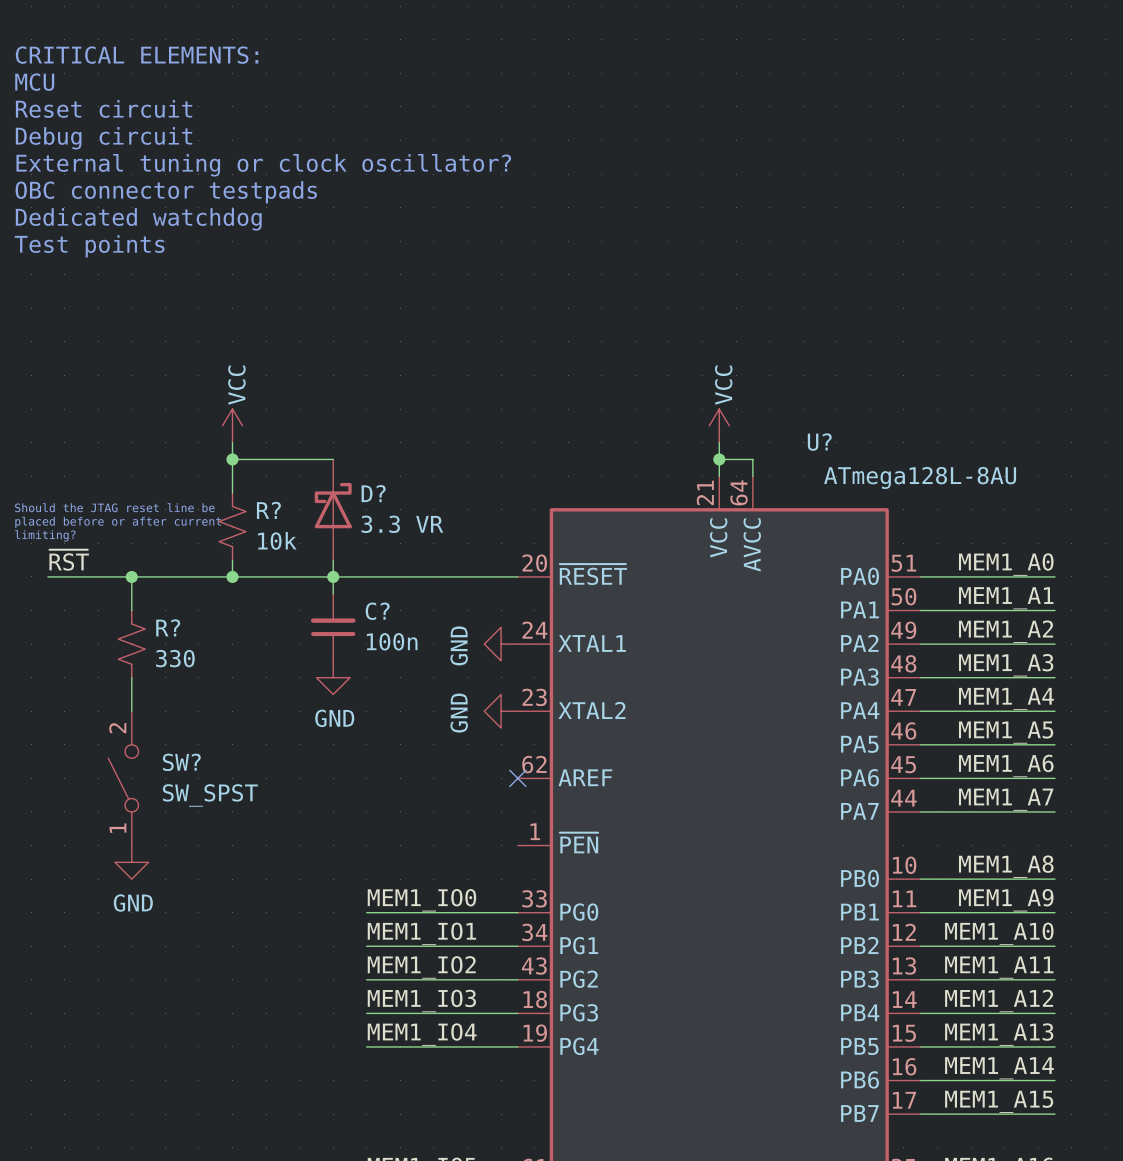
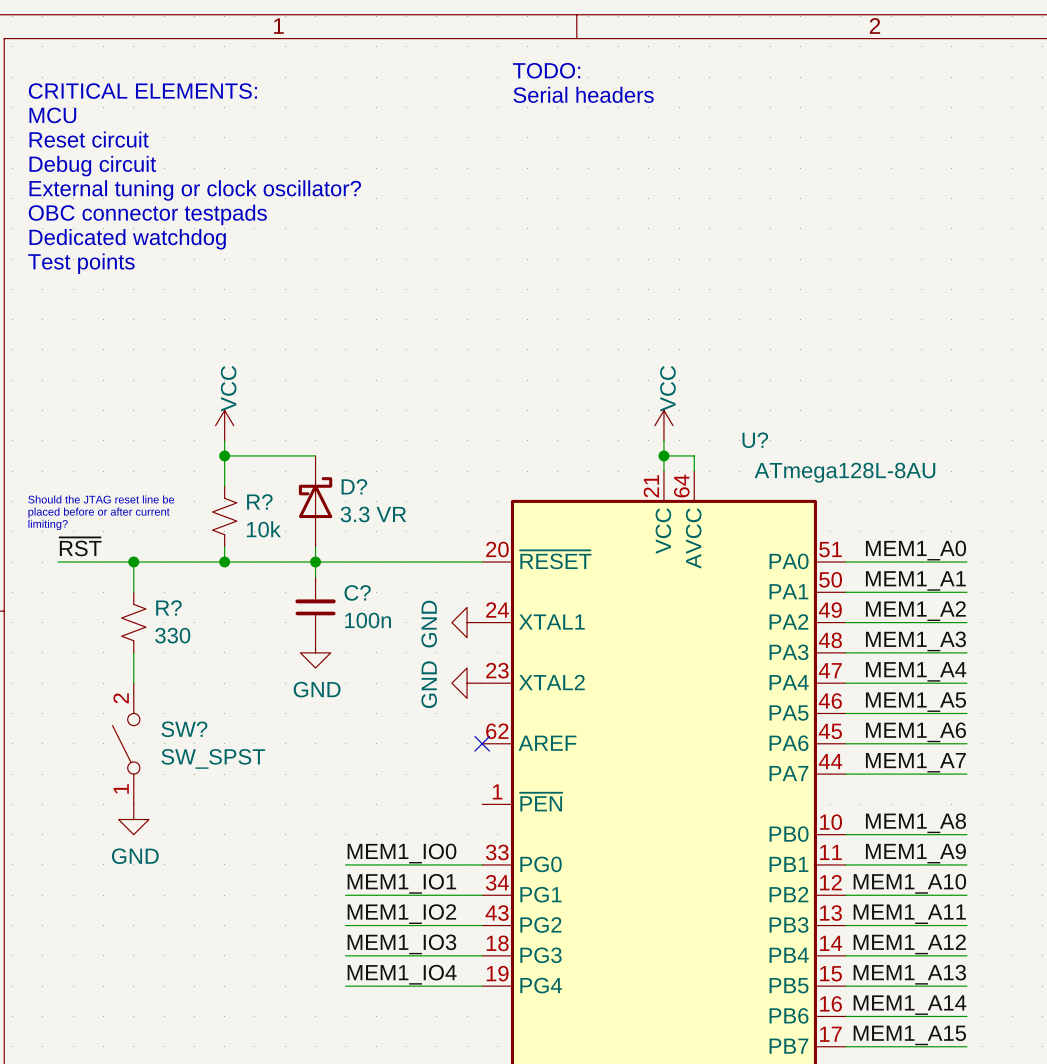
text: none -> TODO: (546, 70)
text: none -> Serial headers (583, 94)

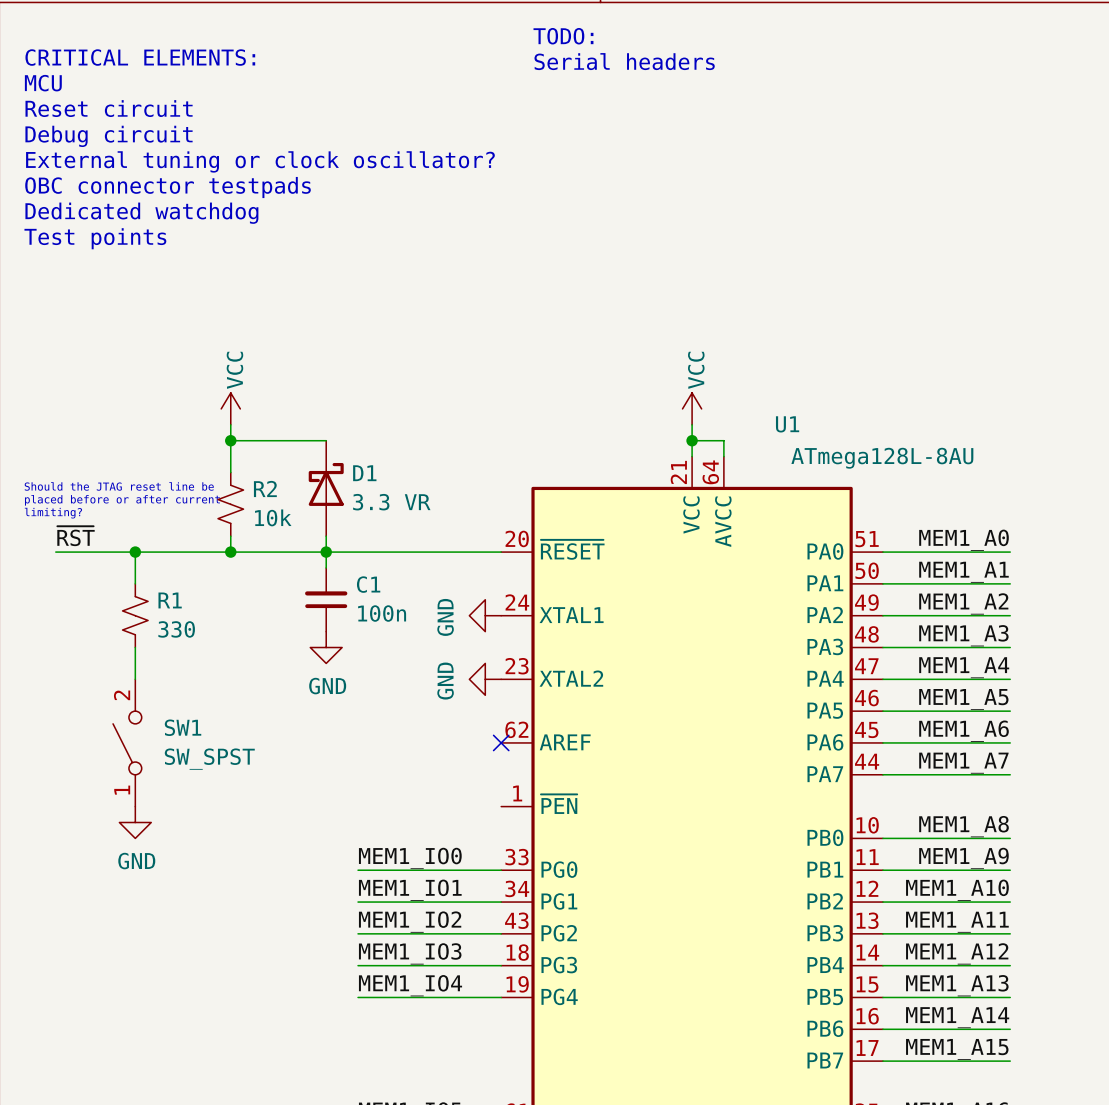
U? name: U? (755, 440) -> U1 (787, 424)
D? name: D? (354, 486) -> D1 (364, 473)
R? name: R? (259, 501) -> R2 (265, 488)
C? name: C? (357, 592) -> C1 (368, 584)
R? name: R? (168, 607) -> R1 (170, 600)
SW? name: SW? (184, 729) -> SW1 (183, 727)

